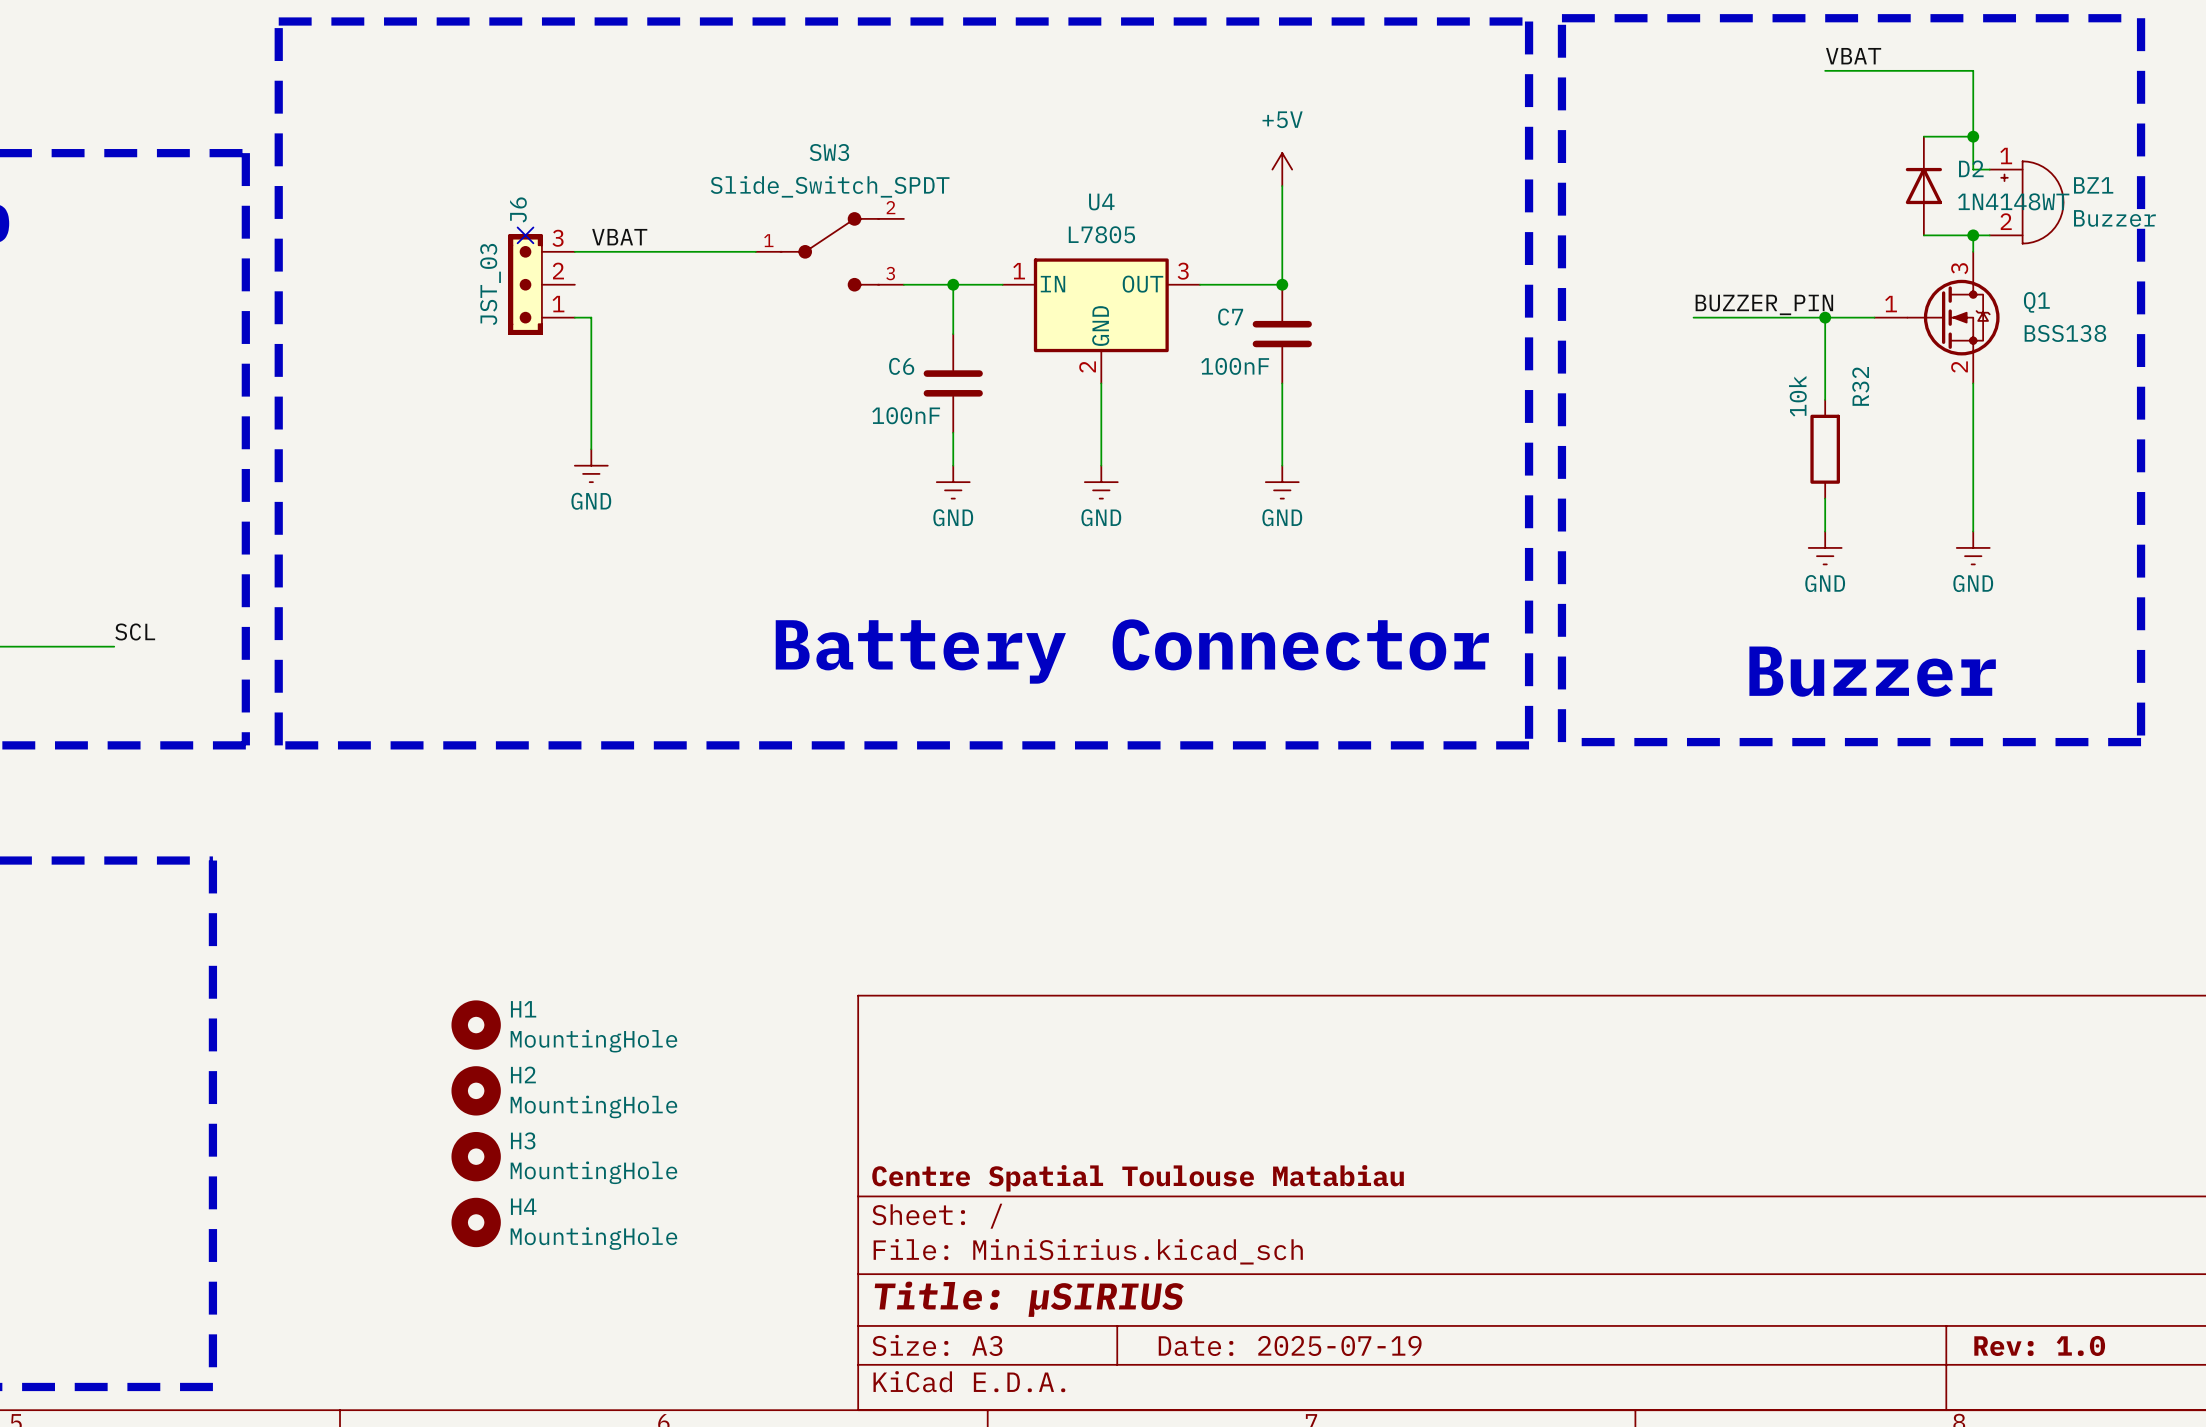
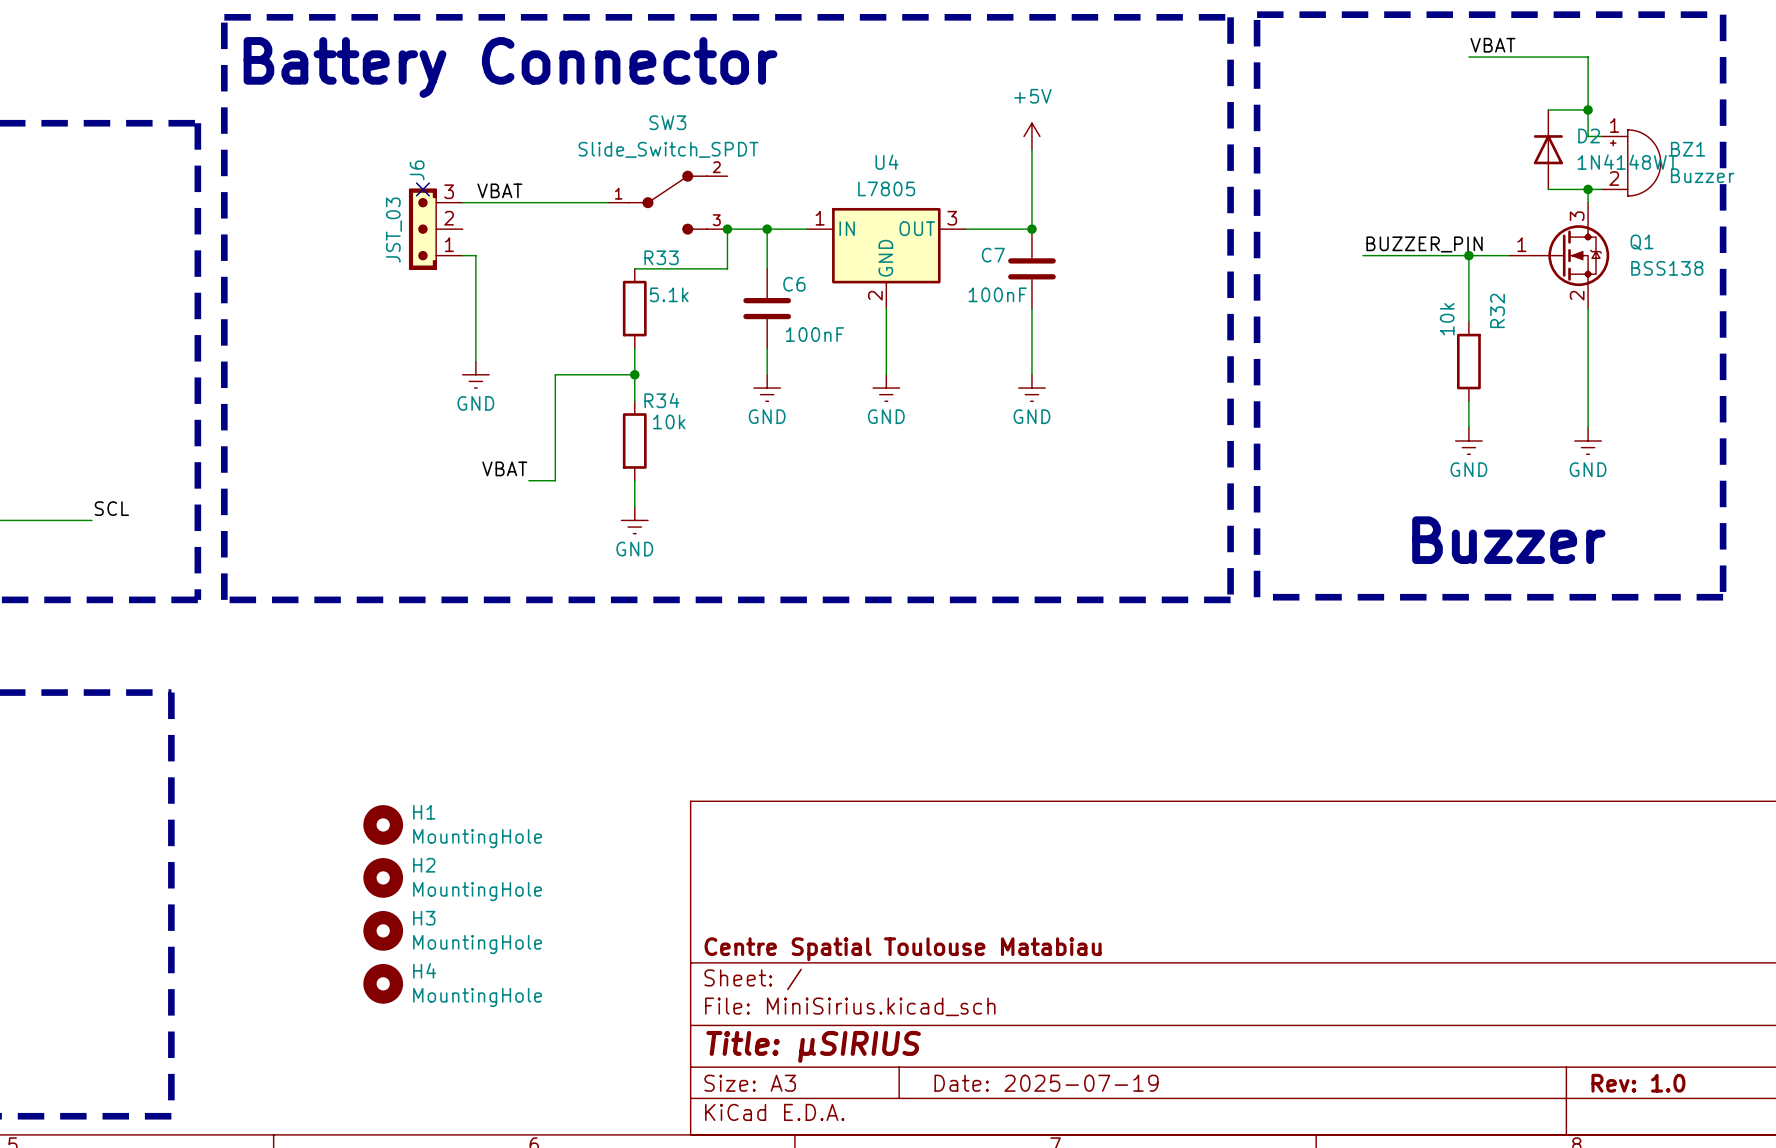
text: none -> Battery Connector (510, 67)
wire: none -> (727, 229) (727, 268) (634, 268)
junction: none -> (727, 229)
C6 name position: C6 (901, 366) -> C6 (794, 284)
R33: none -> 5.1k (634, 308)
C6 value position: 100nF (906, 415) -> 100nF (815, 334)
wire: none -> (634, 348) (634, 401)
wire: none -> (634, 374) (555, 374) (555, 480) (528, 480)
junction: none -> (634, 374)
R34: none -> 10k (634, 440)
label: none -> VBAT (504, 468)
wire: none -> (634, 480) (634, 507)
power symbol: none -> GND (634, 520)
text: Battery Connector (1132, 651) -> none

